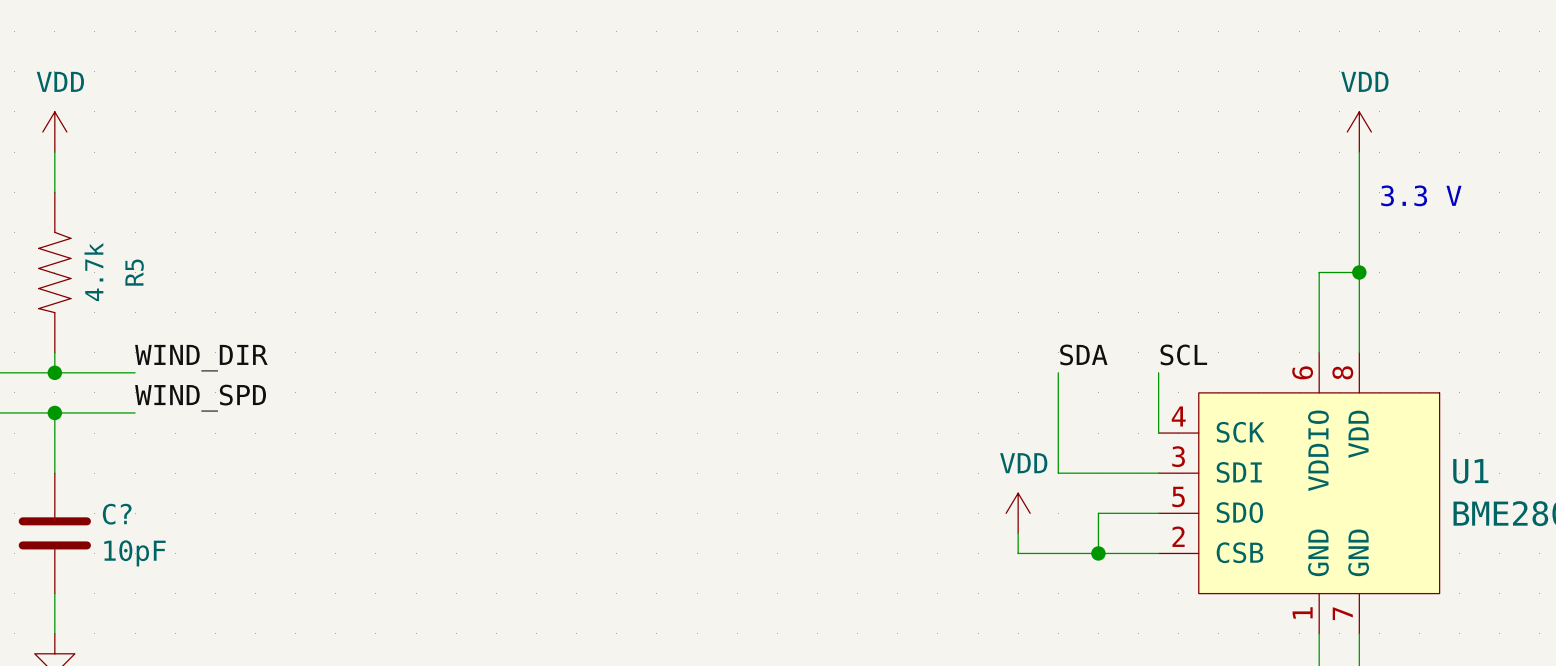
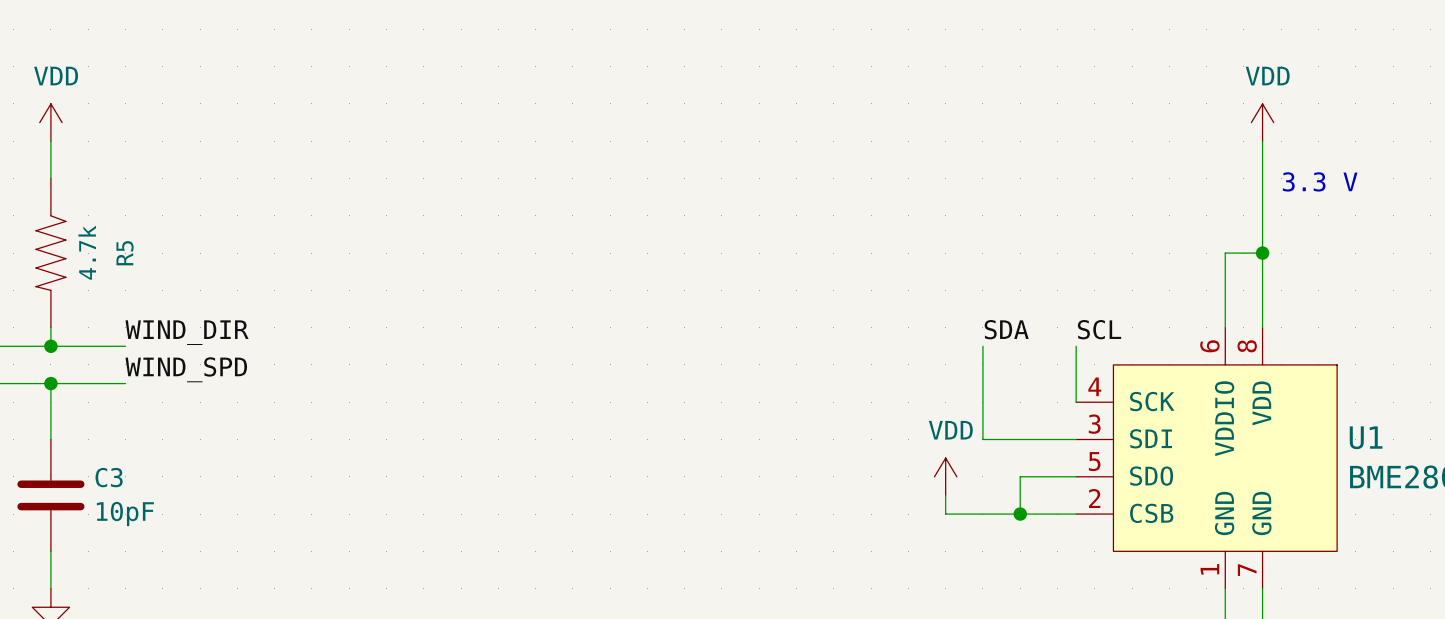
C? name: C? (117, 514) -> C3 (109, 477)

